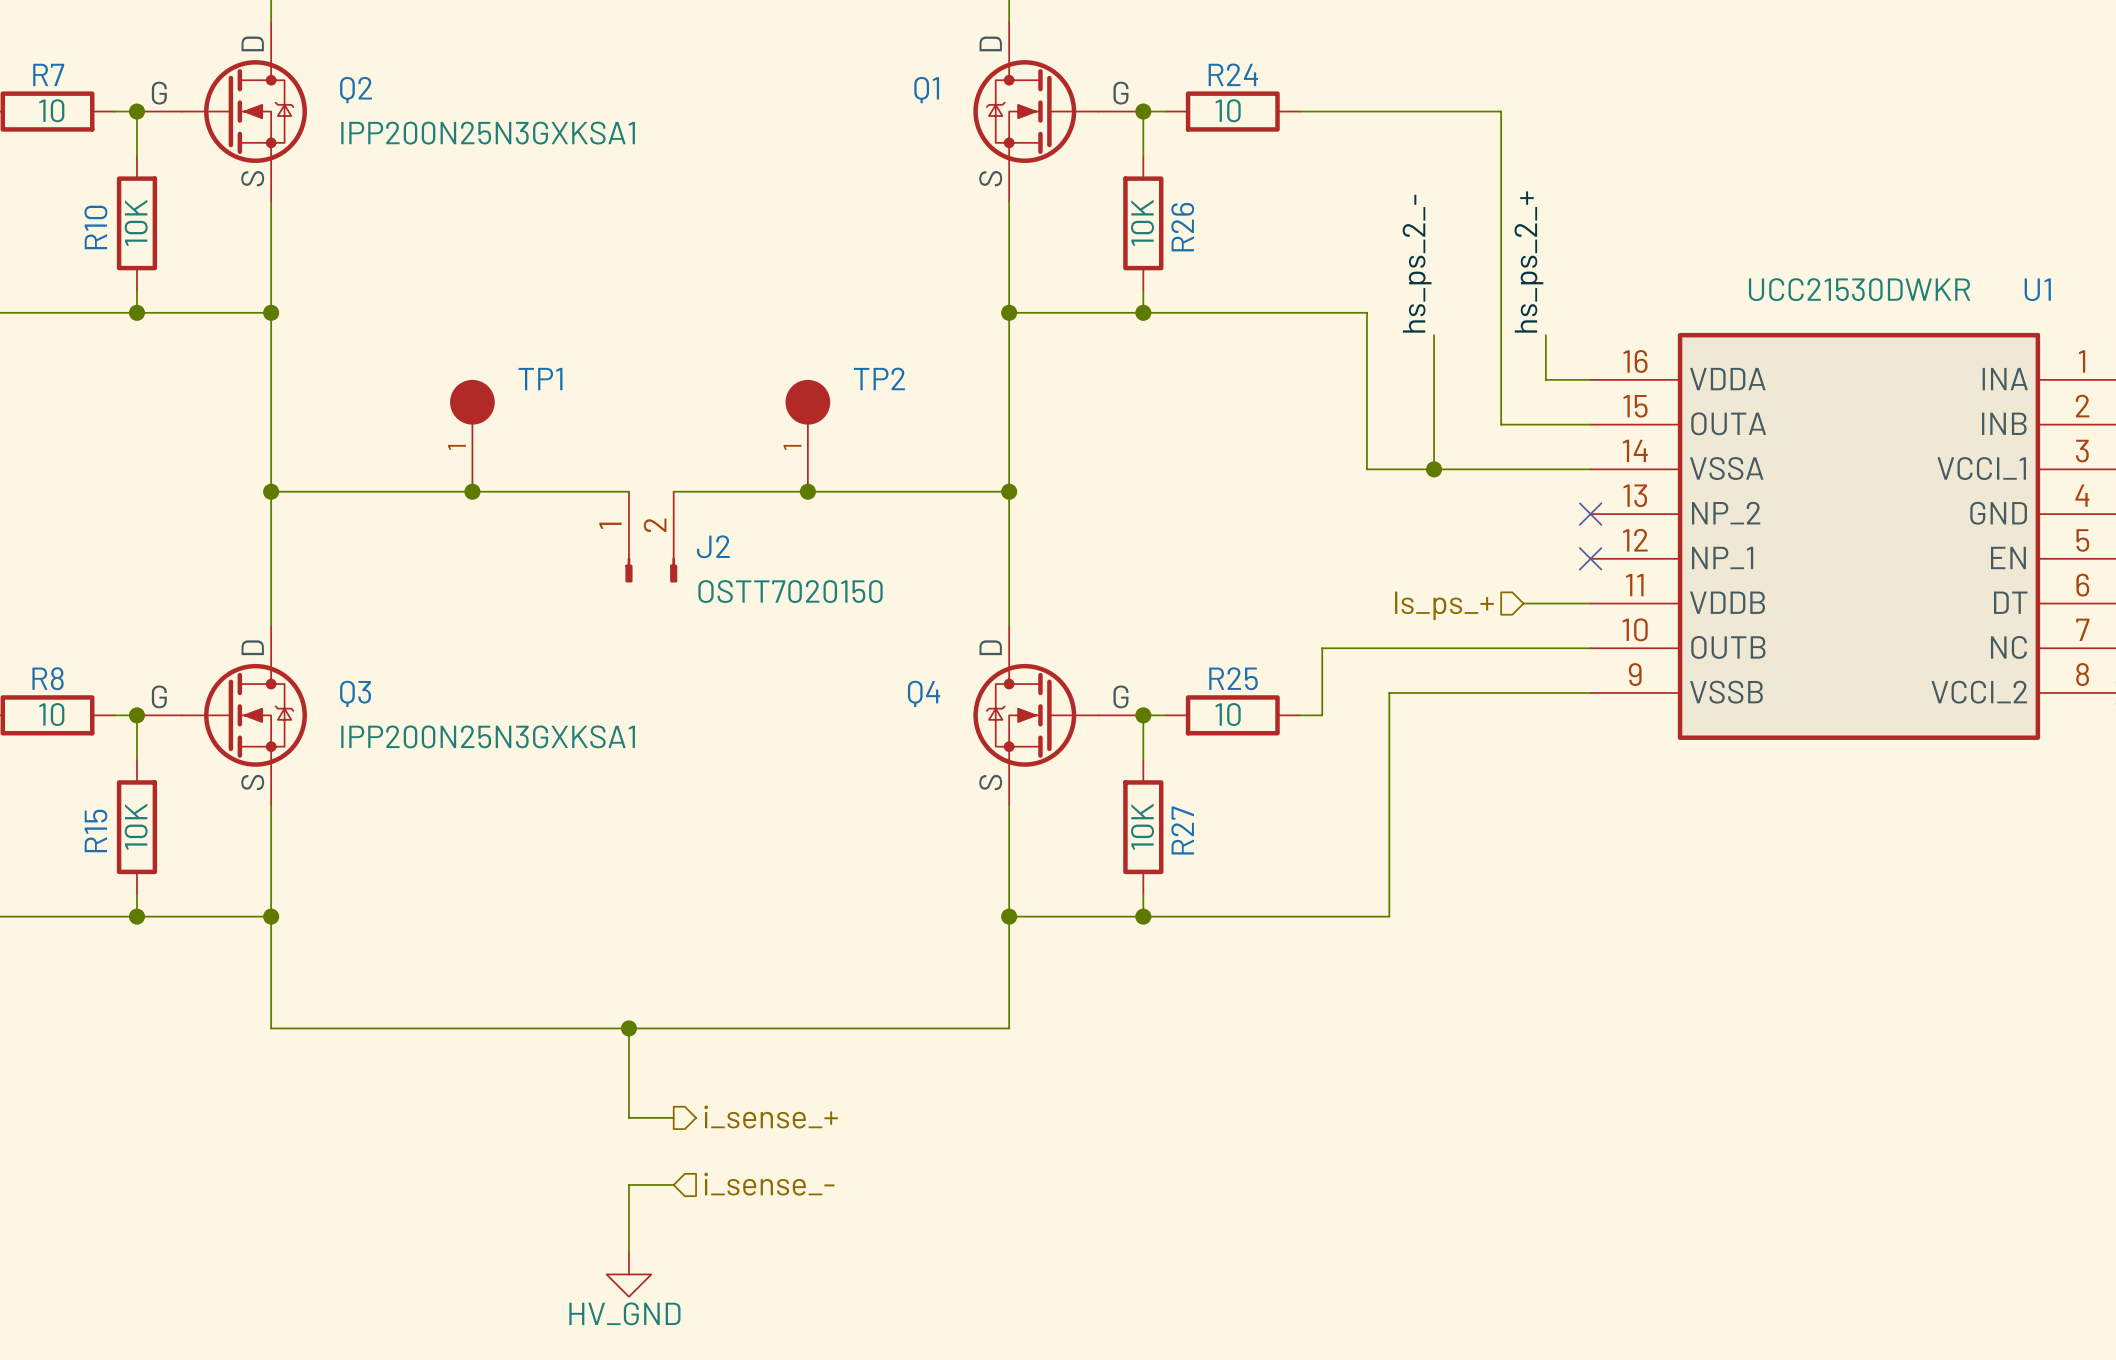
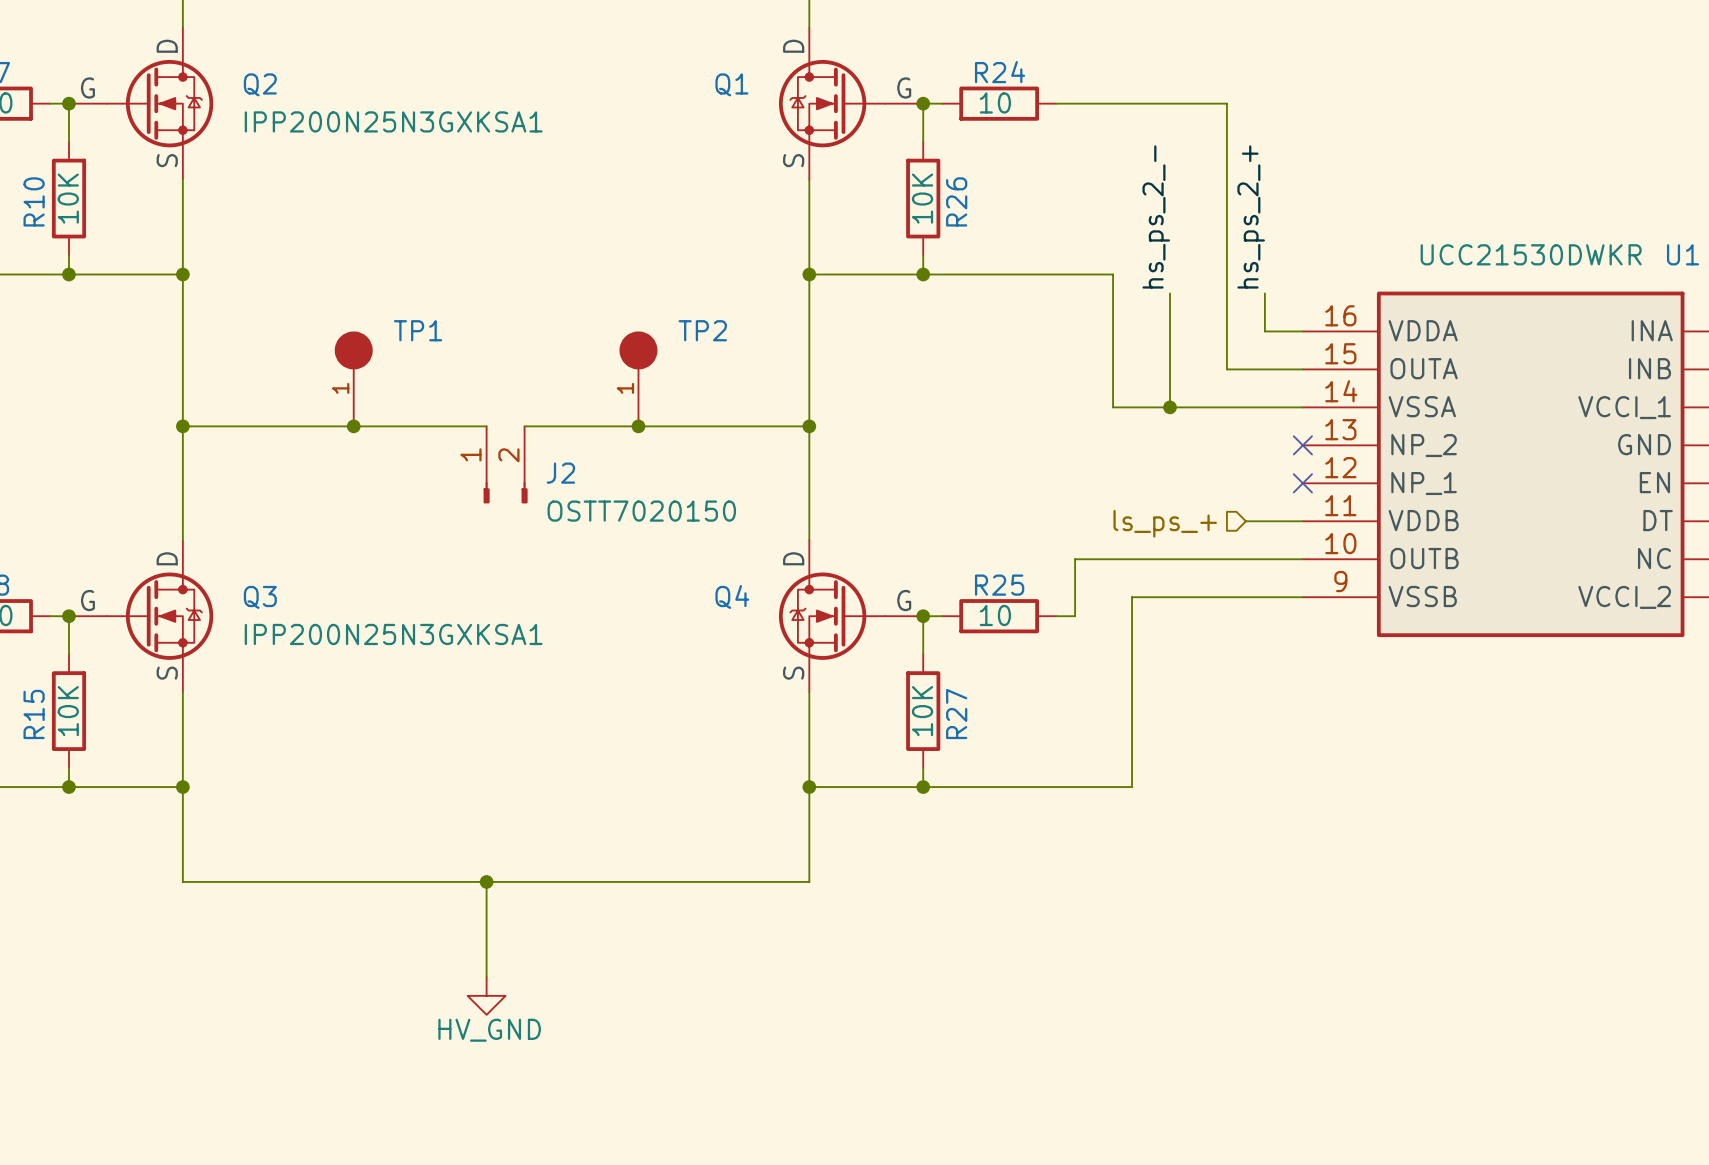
wire: (628, 1117) (673, 1117) -> (486, 957) (486, 976)
hierarchical label: i_sense_+ (771, 1117) -> none
wire: (673, 1184) (628, 1184) (628, 1252) -> none
hierarchical label: i_sense_- (769, 1184) -> none
power symbol position: HV_GND (628, 1274) -> HV_GND (486, 995)

